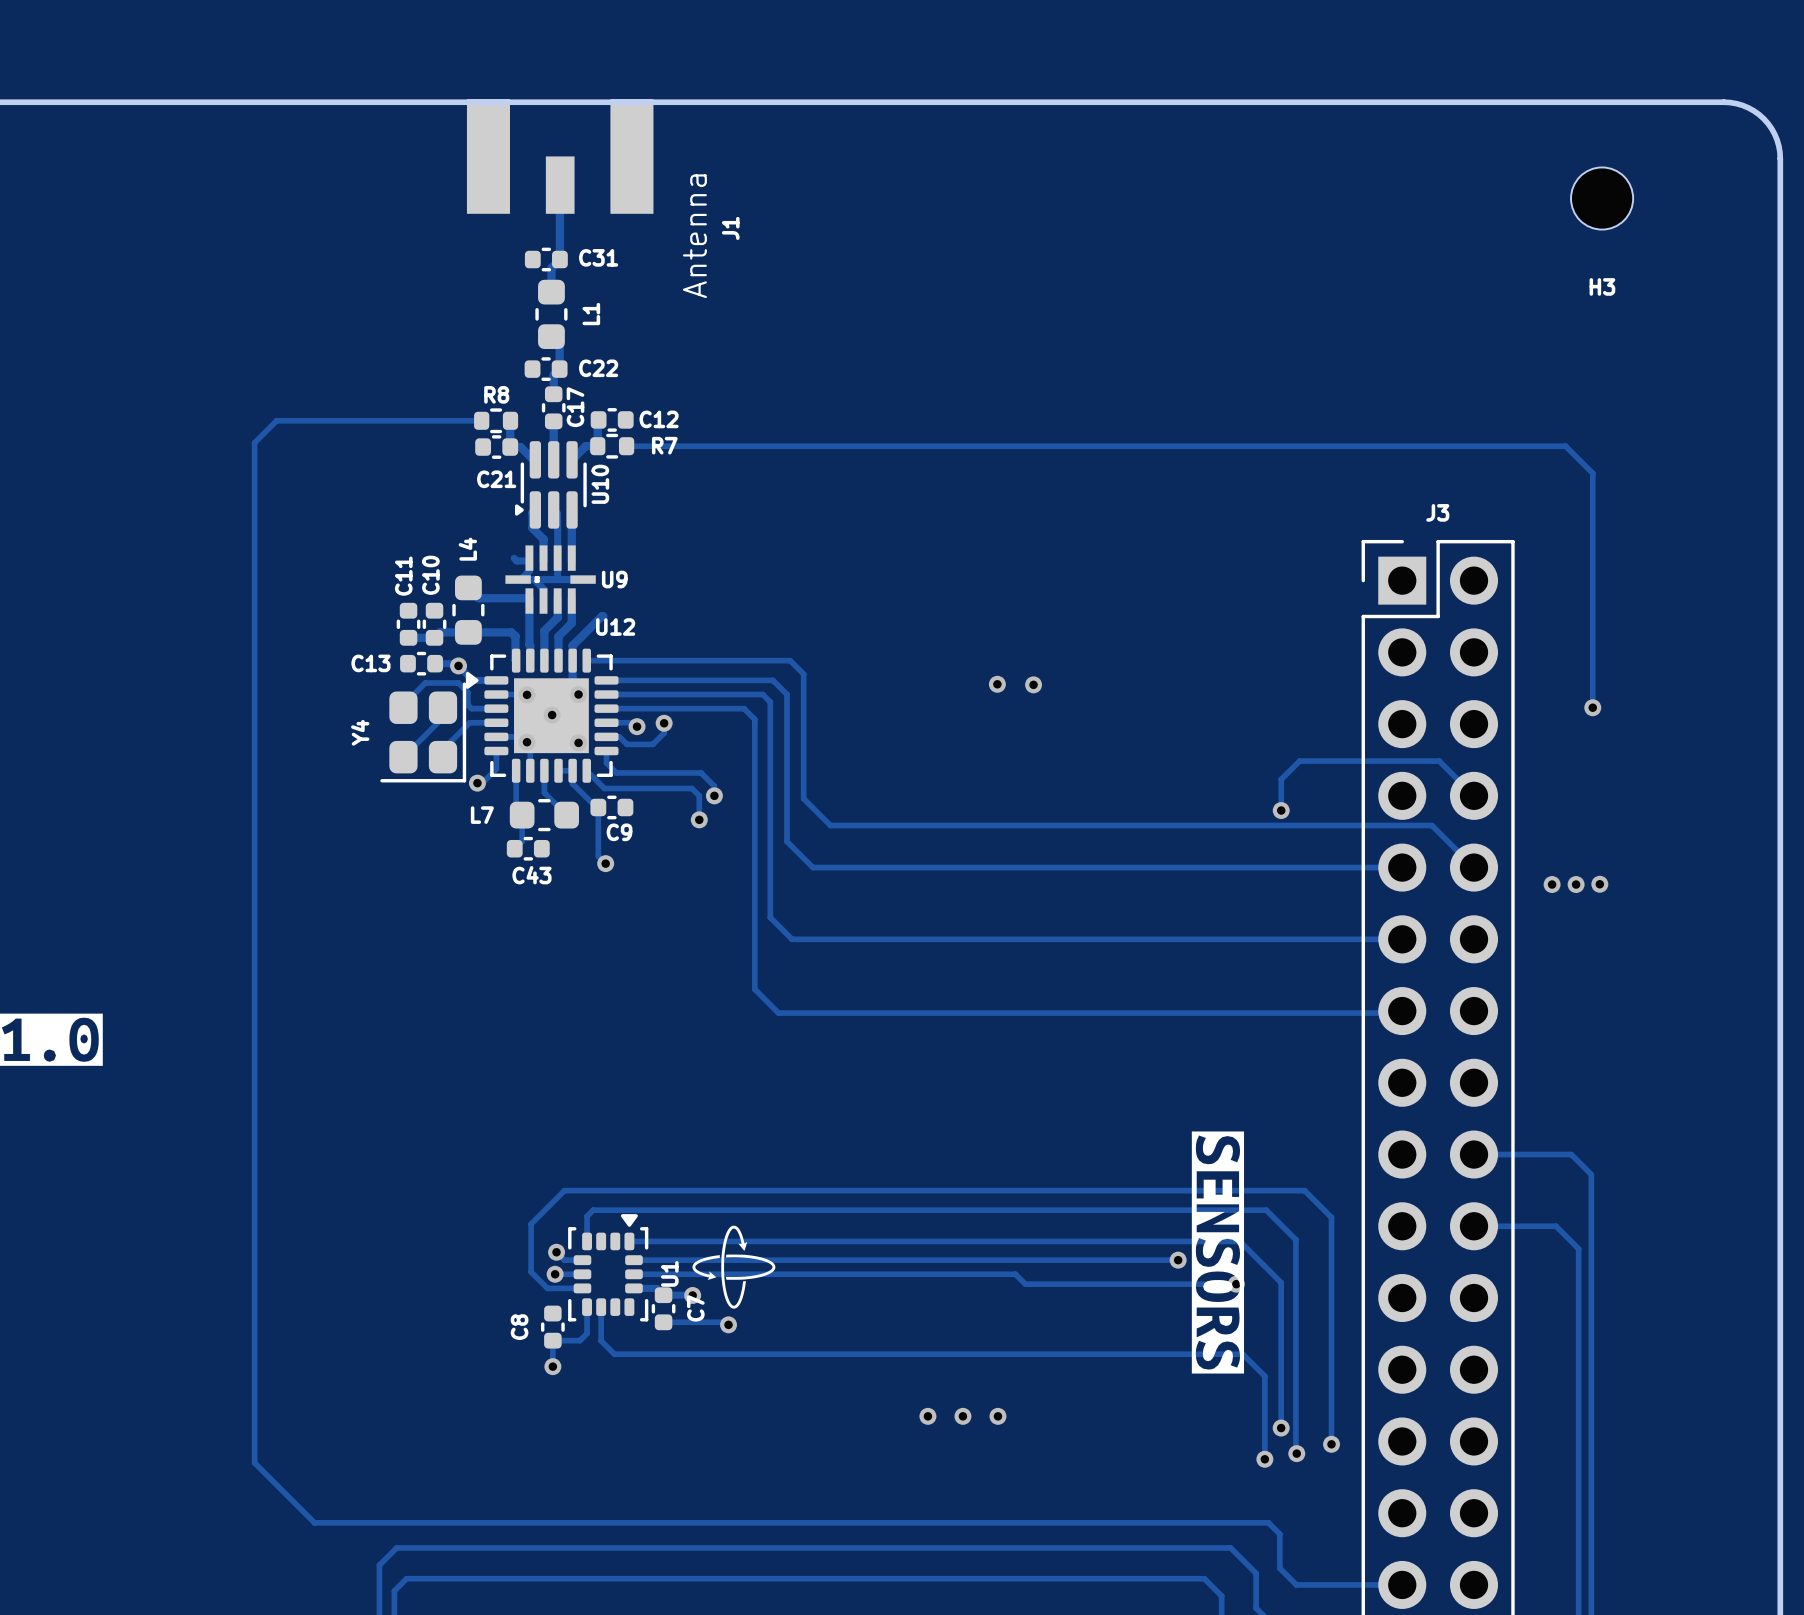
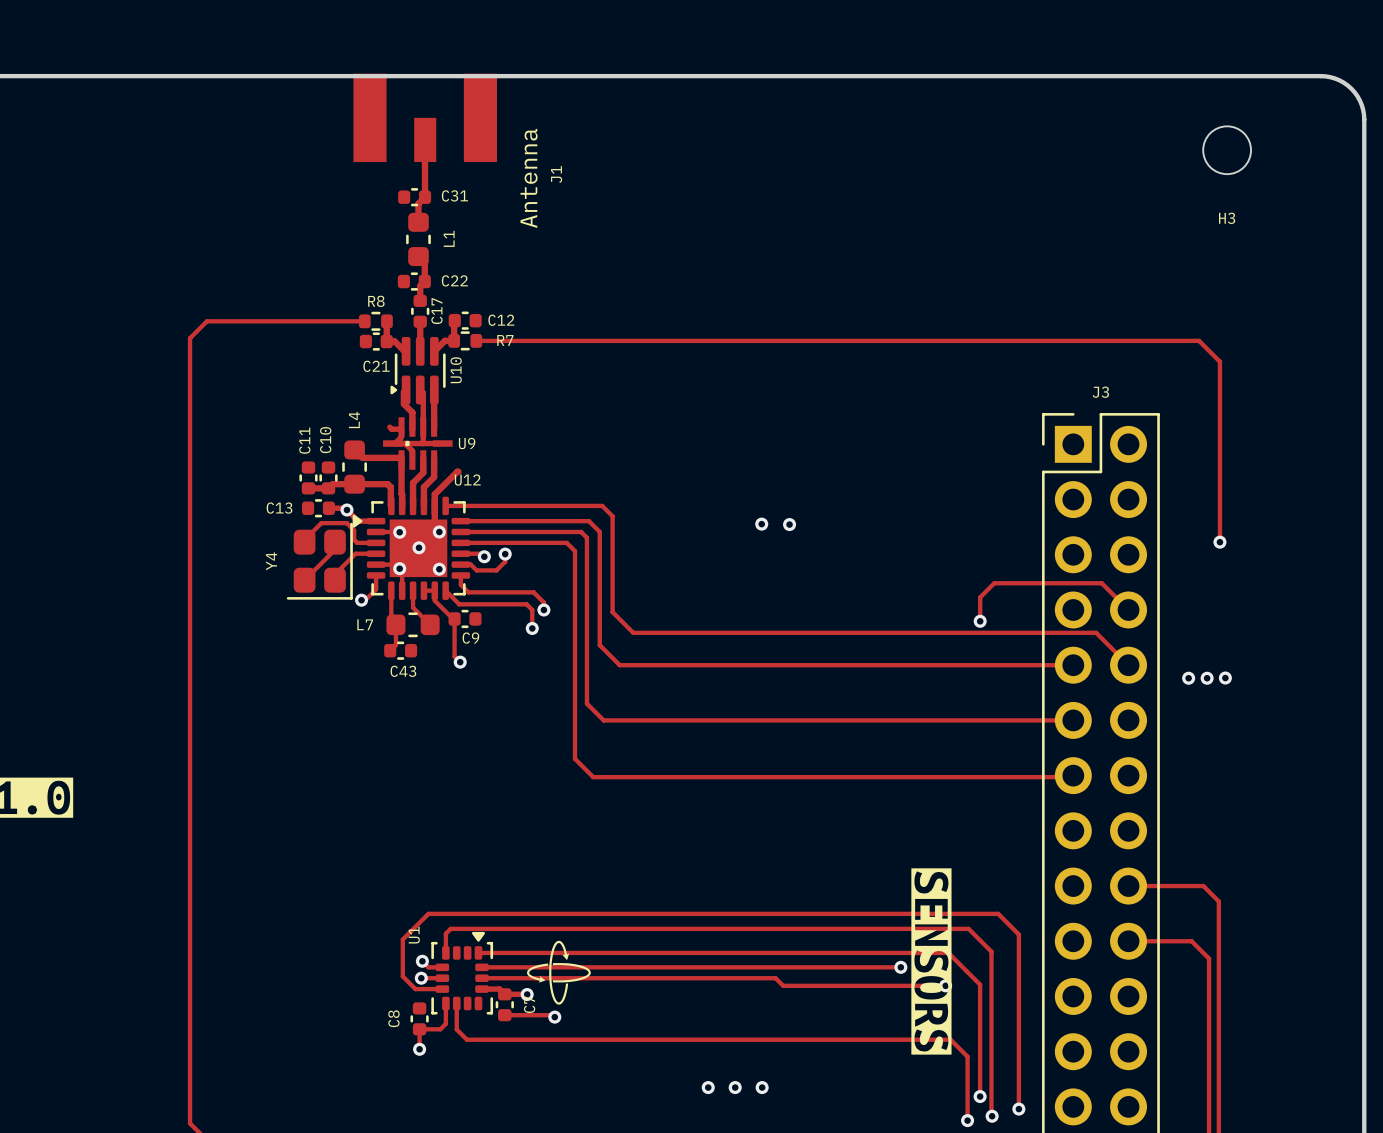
U1 name position: U1 (669, 1273) -> U1 (414, 935)

